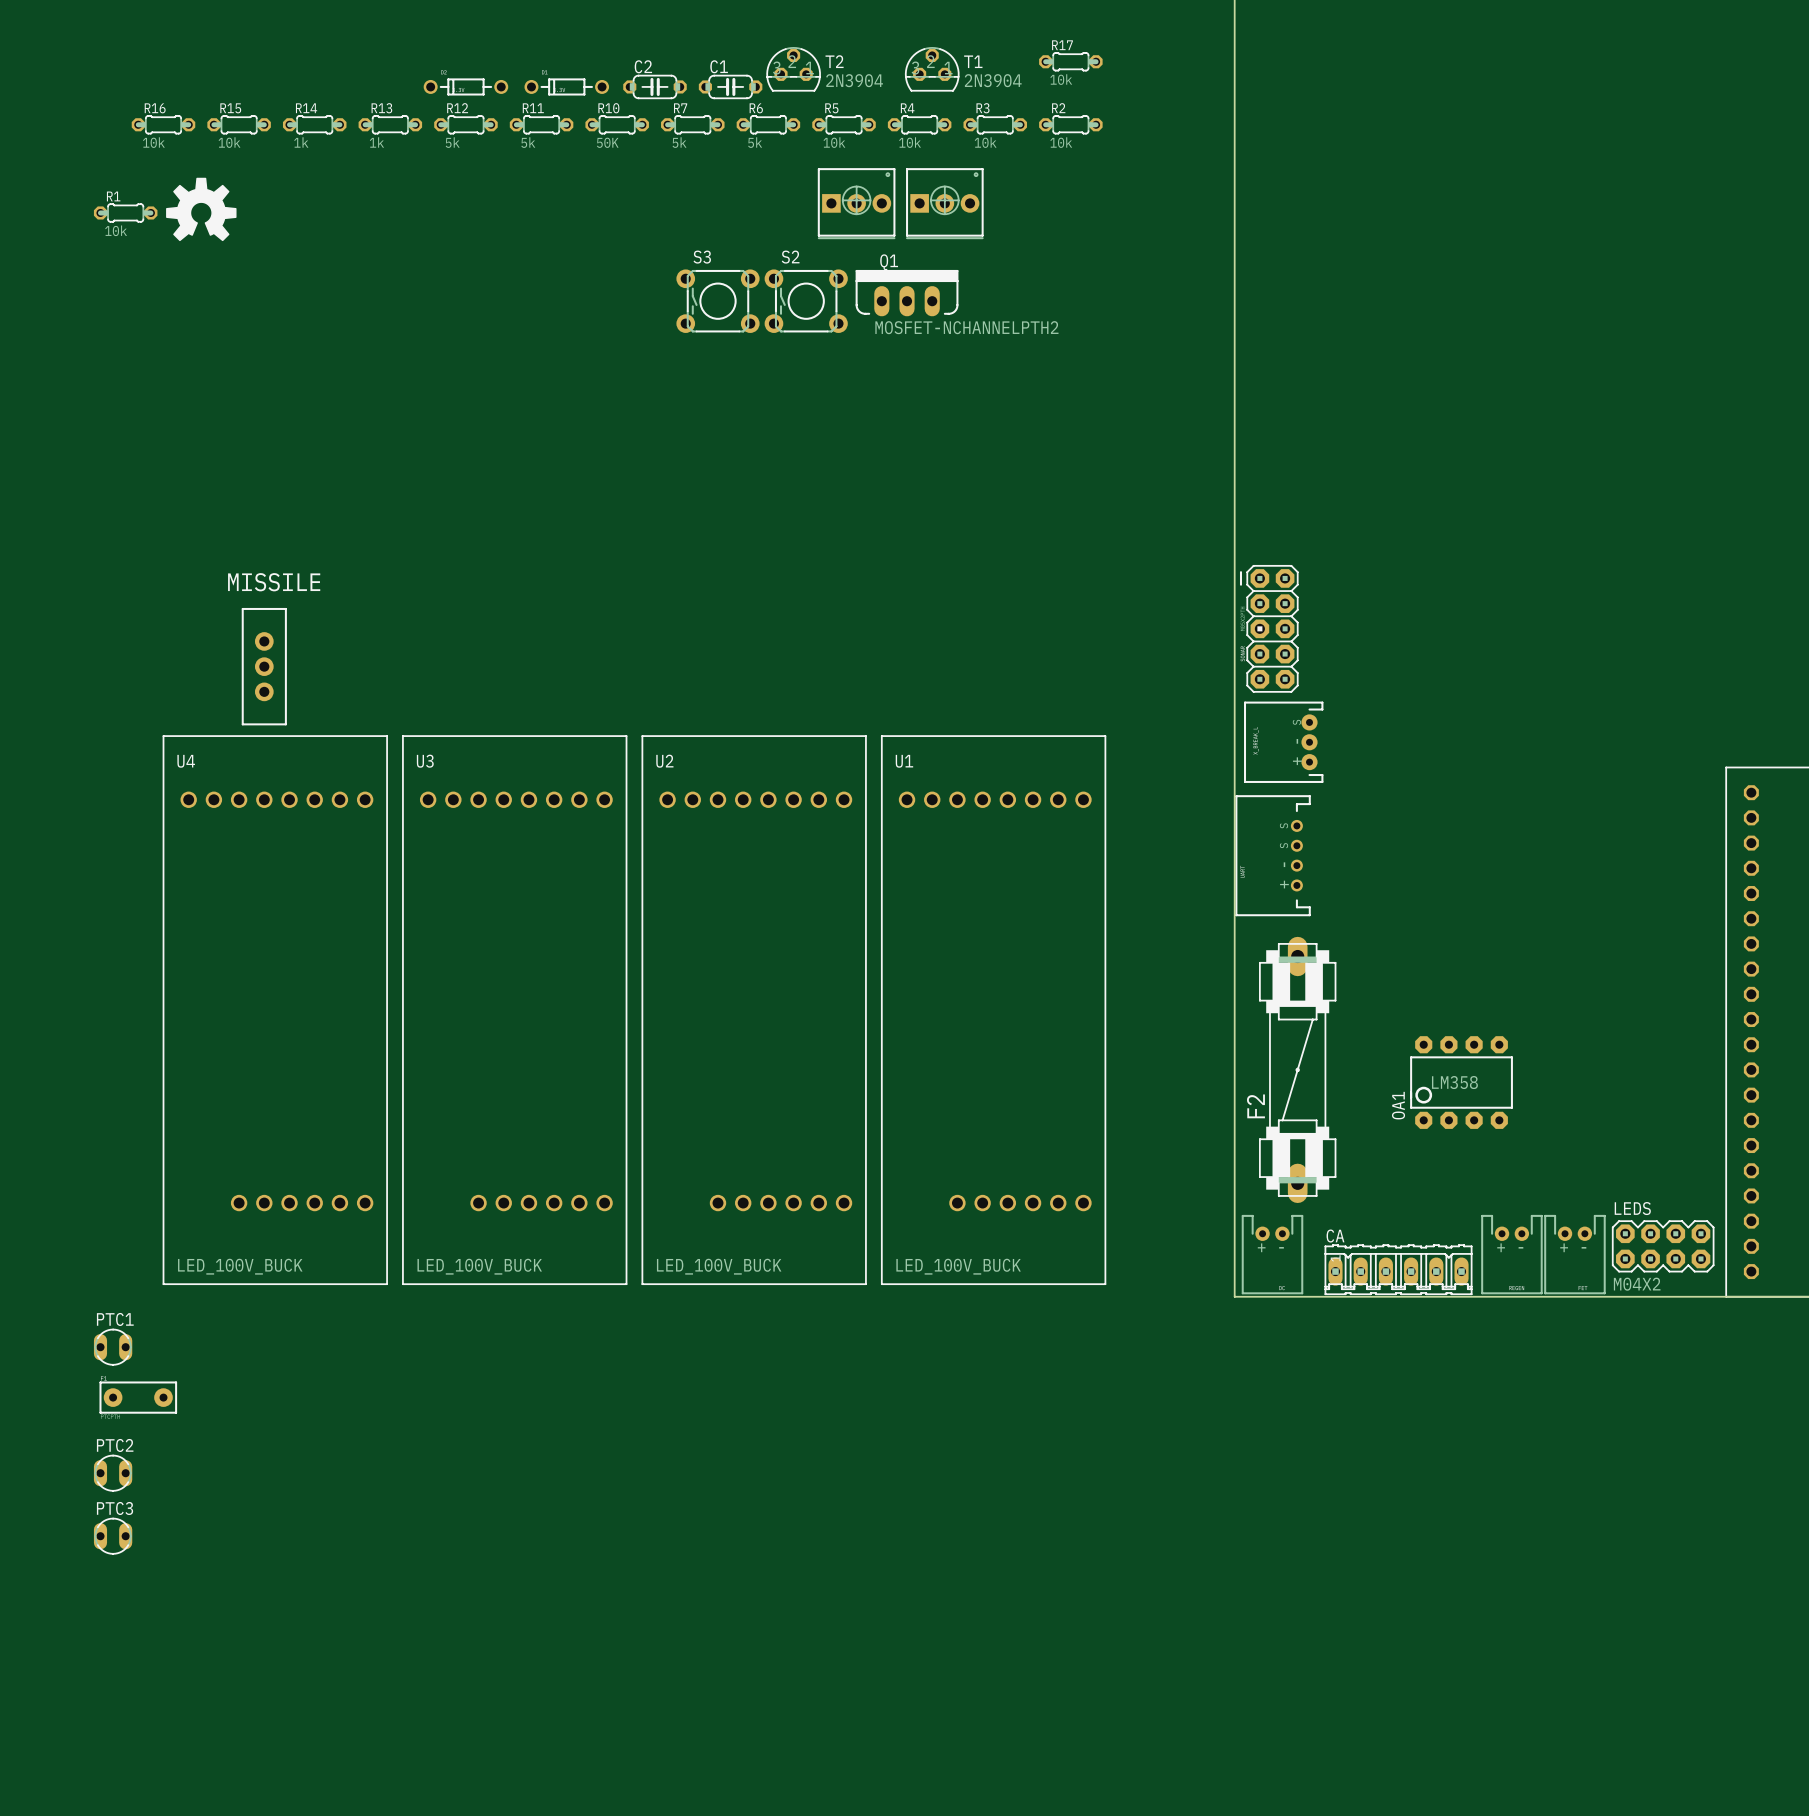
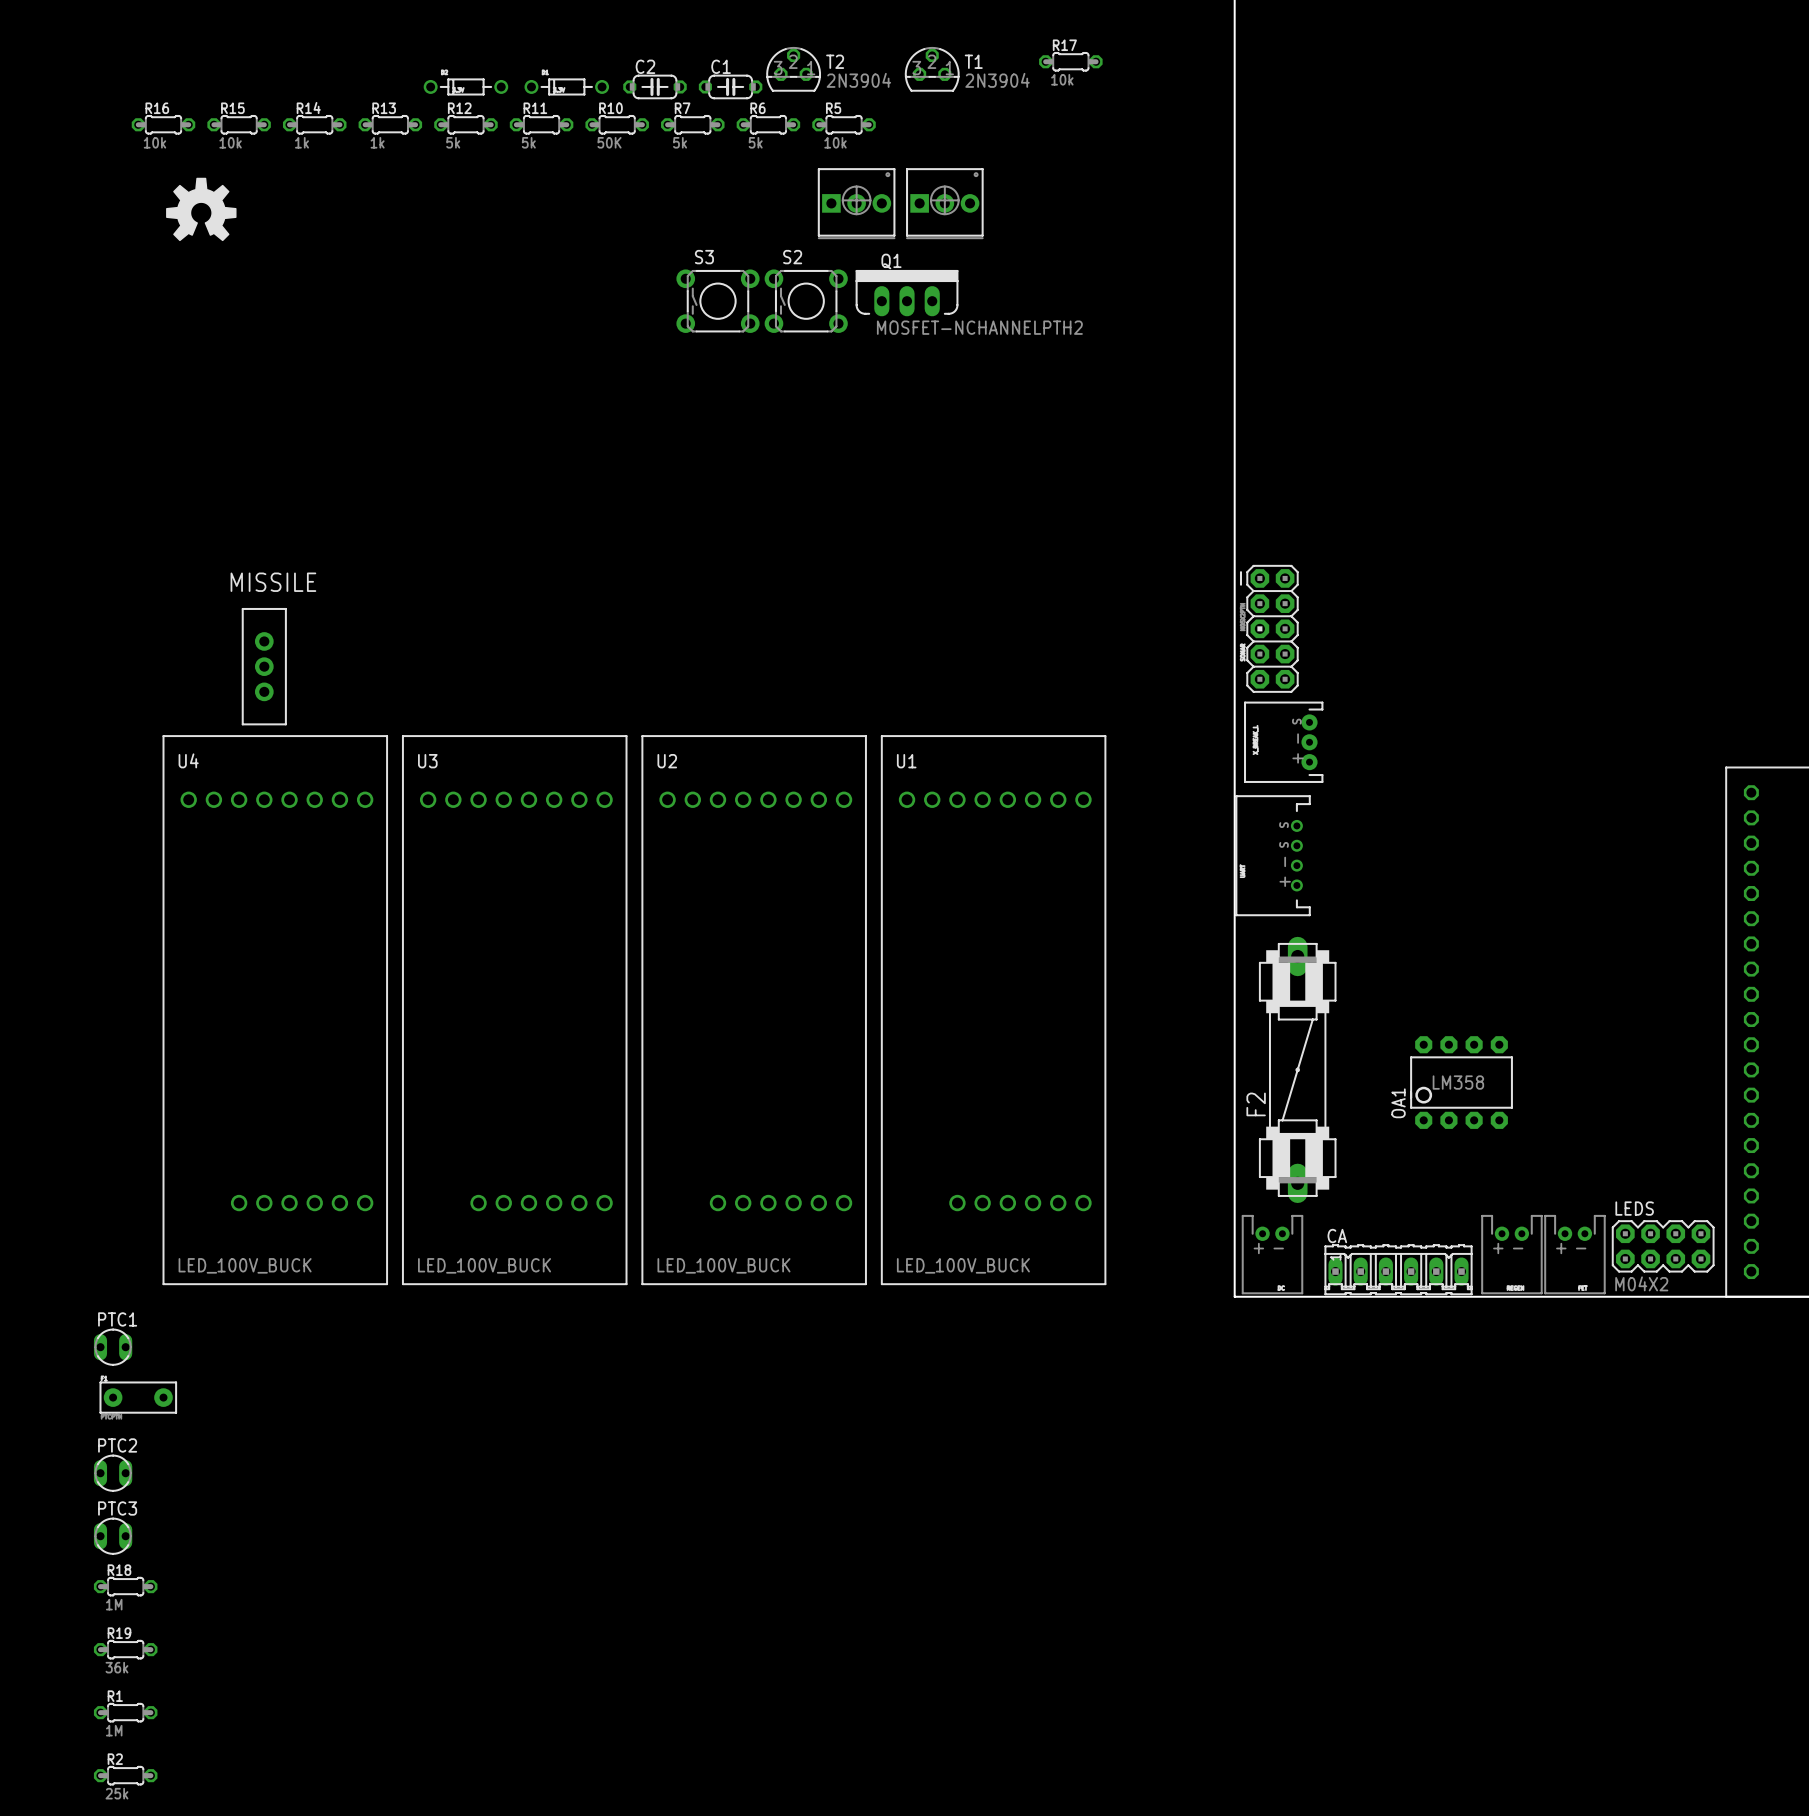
R4: 10k (919, 124) -> none
R3: 10k (995, 124) -> none
R2 position: (1070, 124) -> (125, 1775)
R2 value: 10k (1061, 142) -> 25k (116, 1793)
R1 position: (125, 212) -> (125, 1712)
R1 value: 10k (116, 230) -> 1M (114, 1730)
R18: none -> 1M (125, 1586)
R19: none -> 36k (125, 1649)

